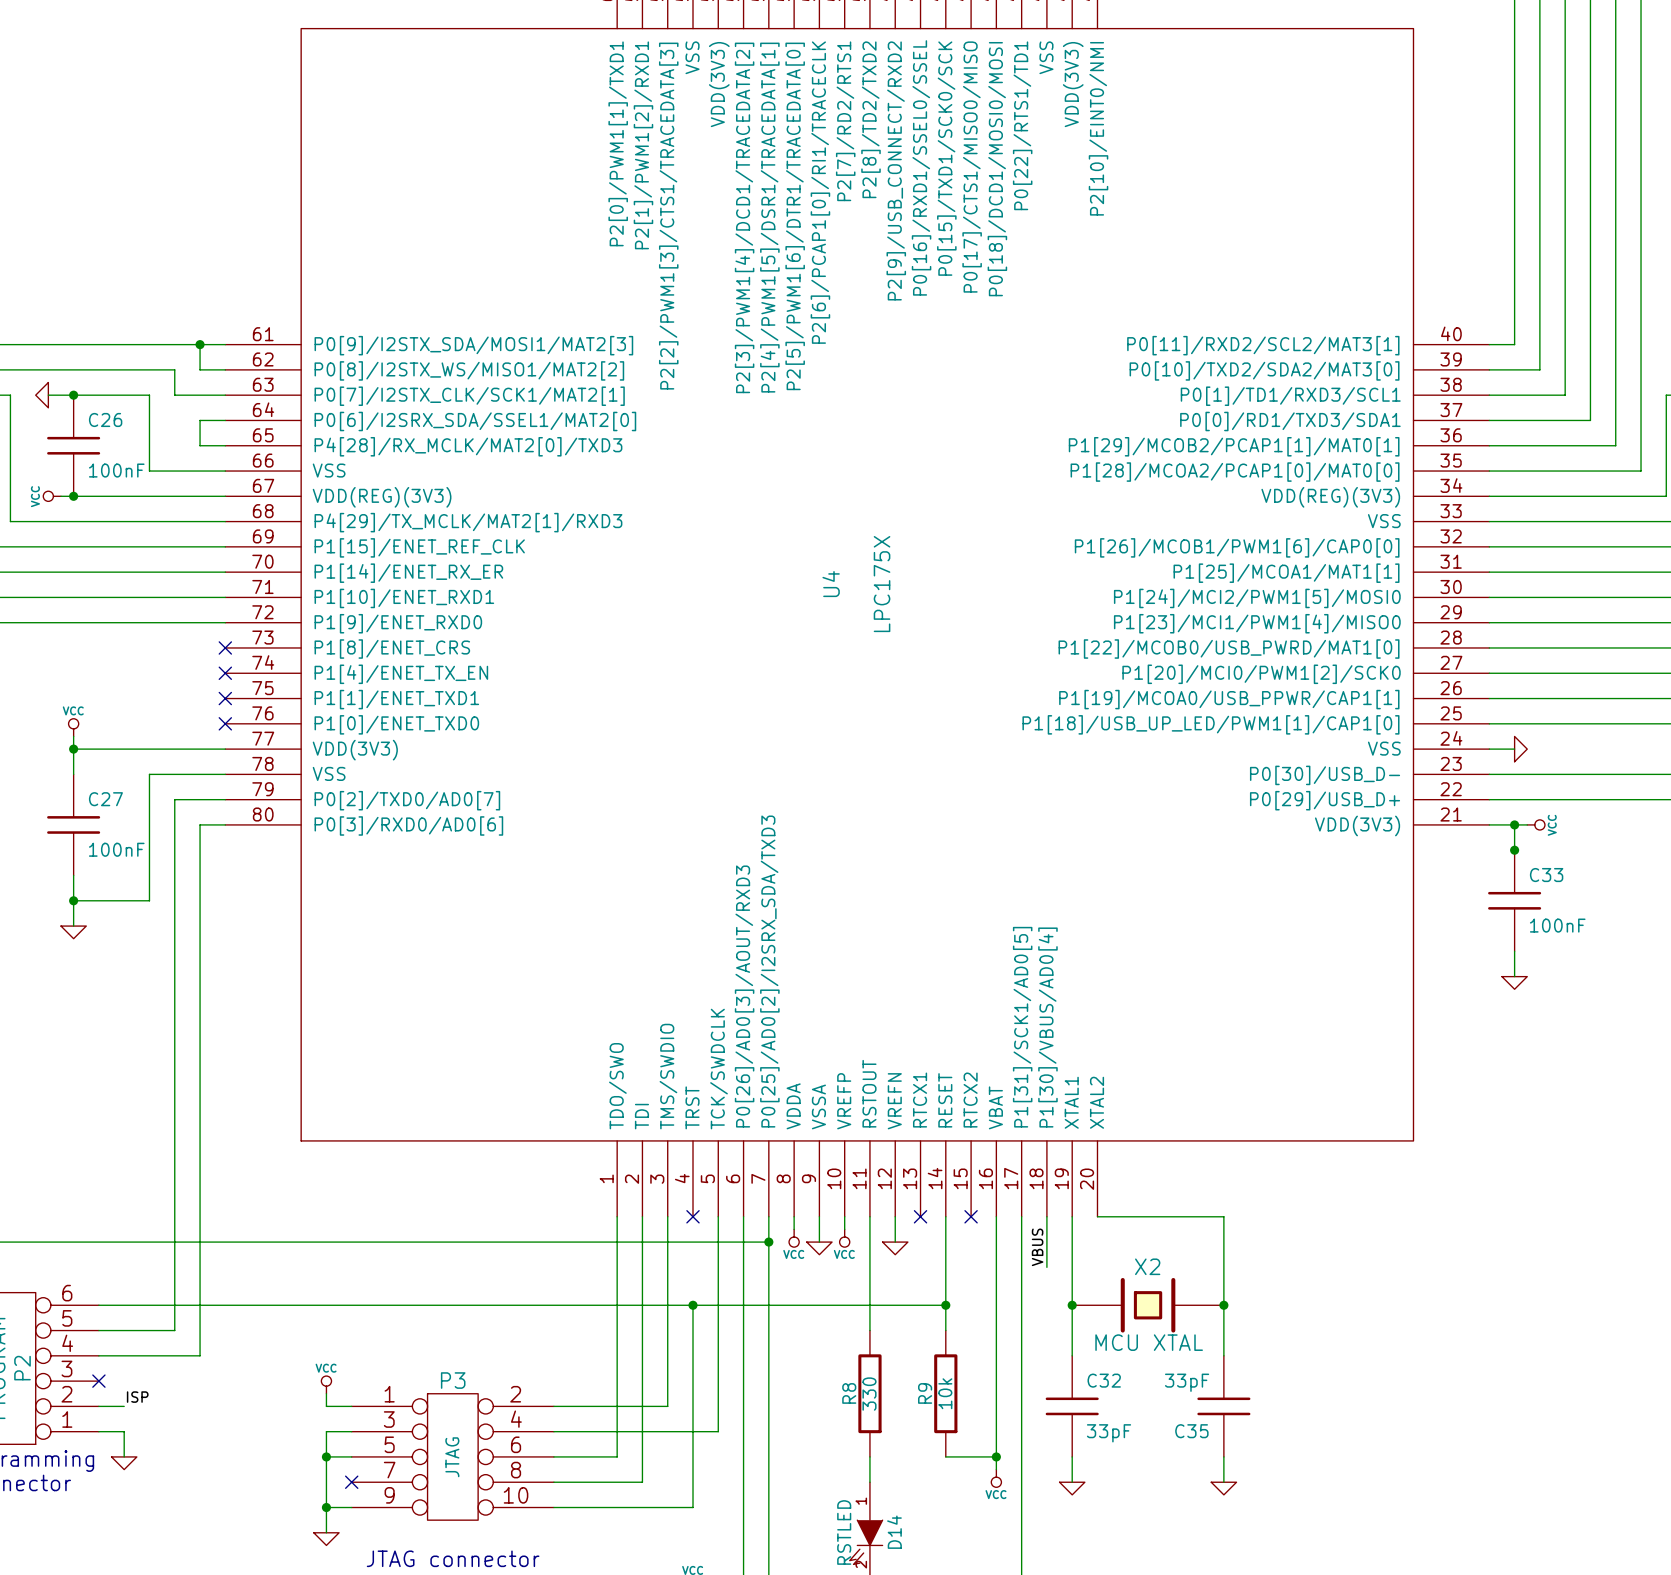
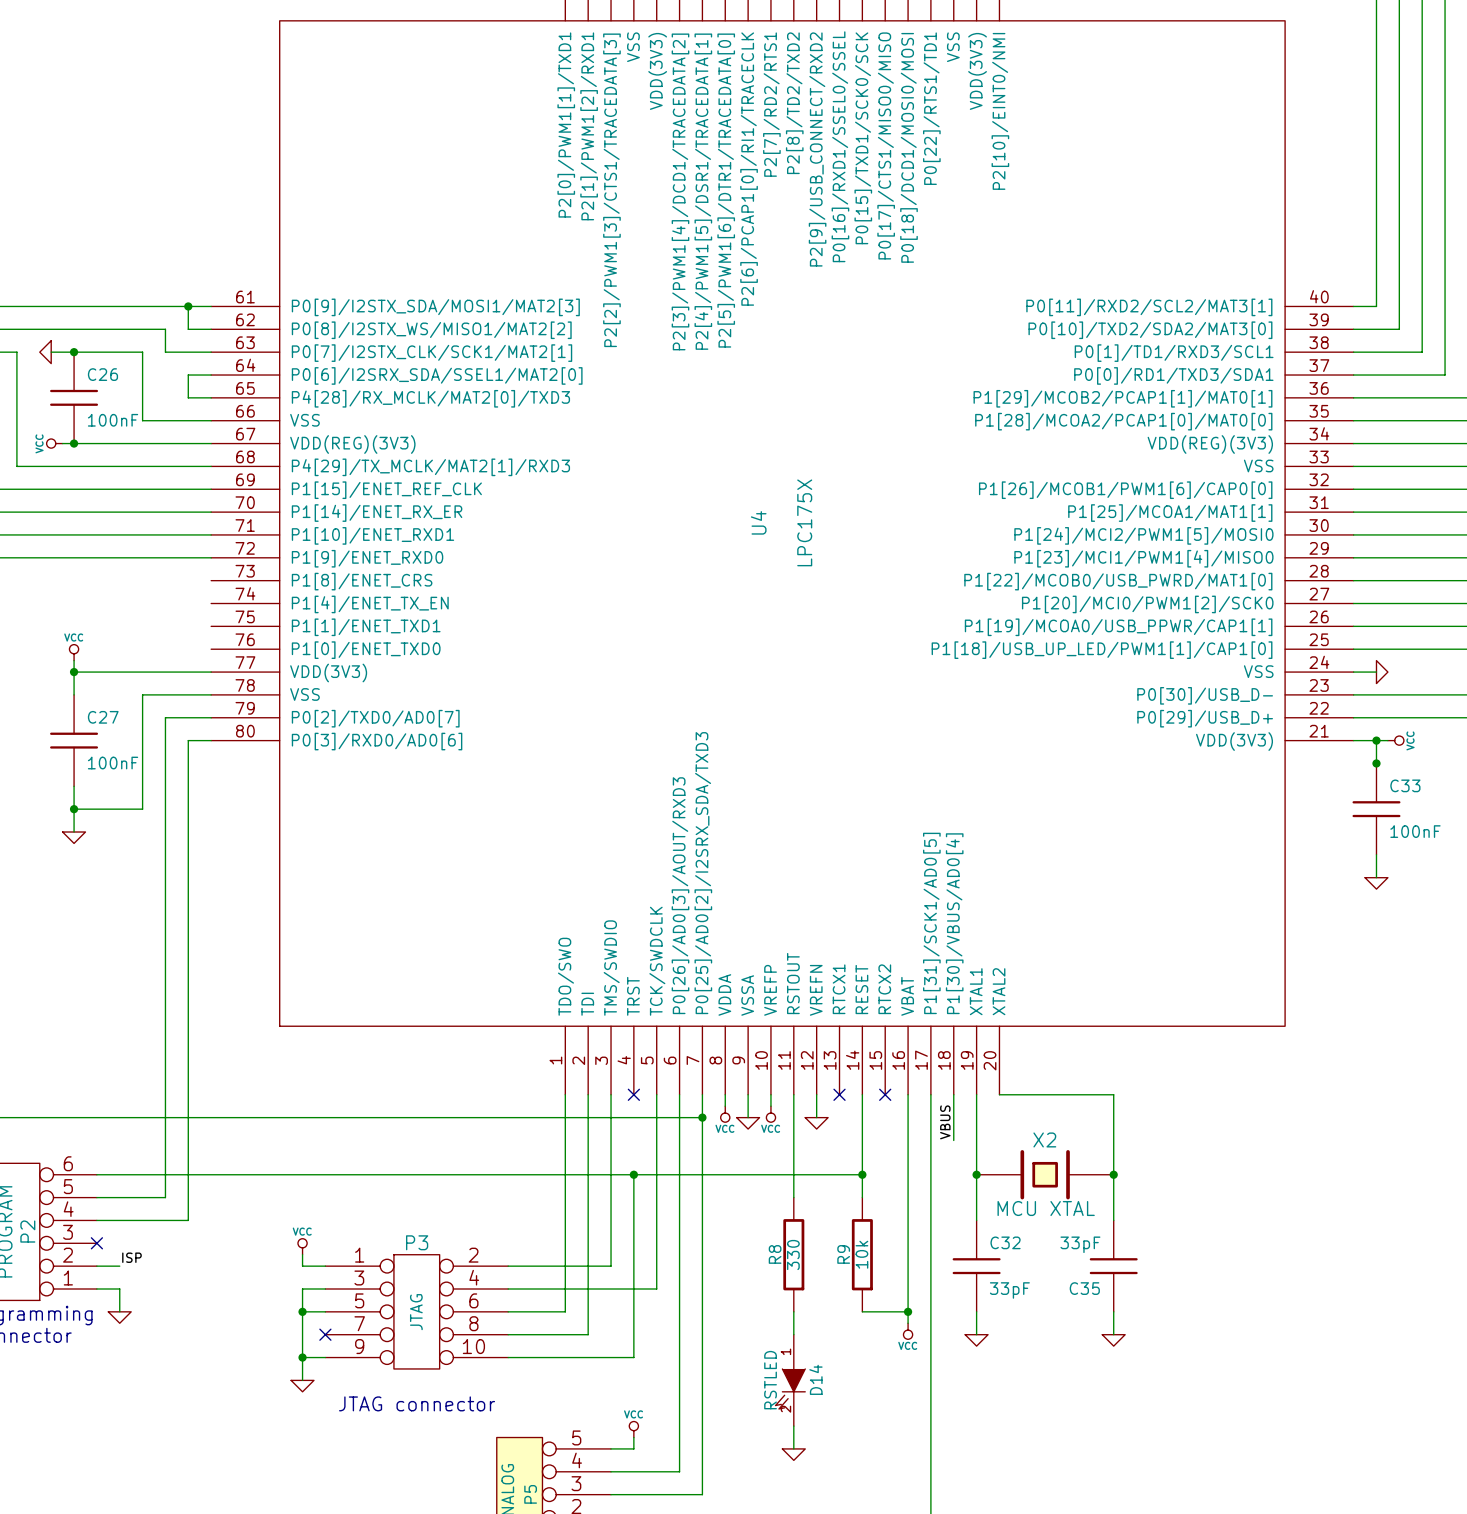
no-connect mark: (225, 647) -> none
no-connect mark: (225, 673) -> none
no-connect mark: (225, 698) -> none
no-connect mark: (225, 723) -> none

